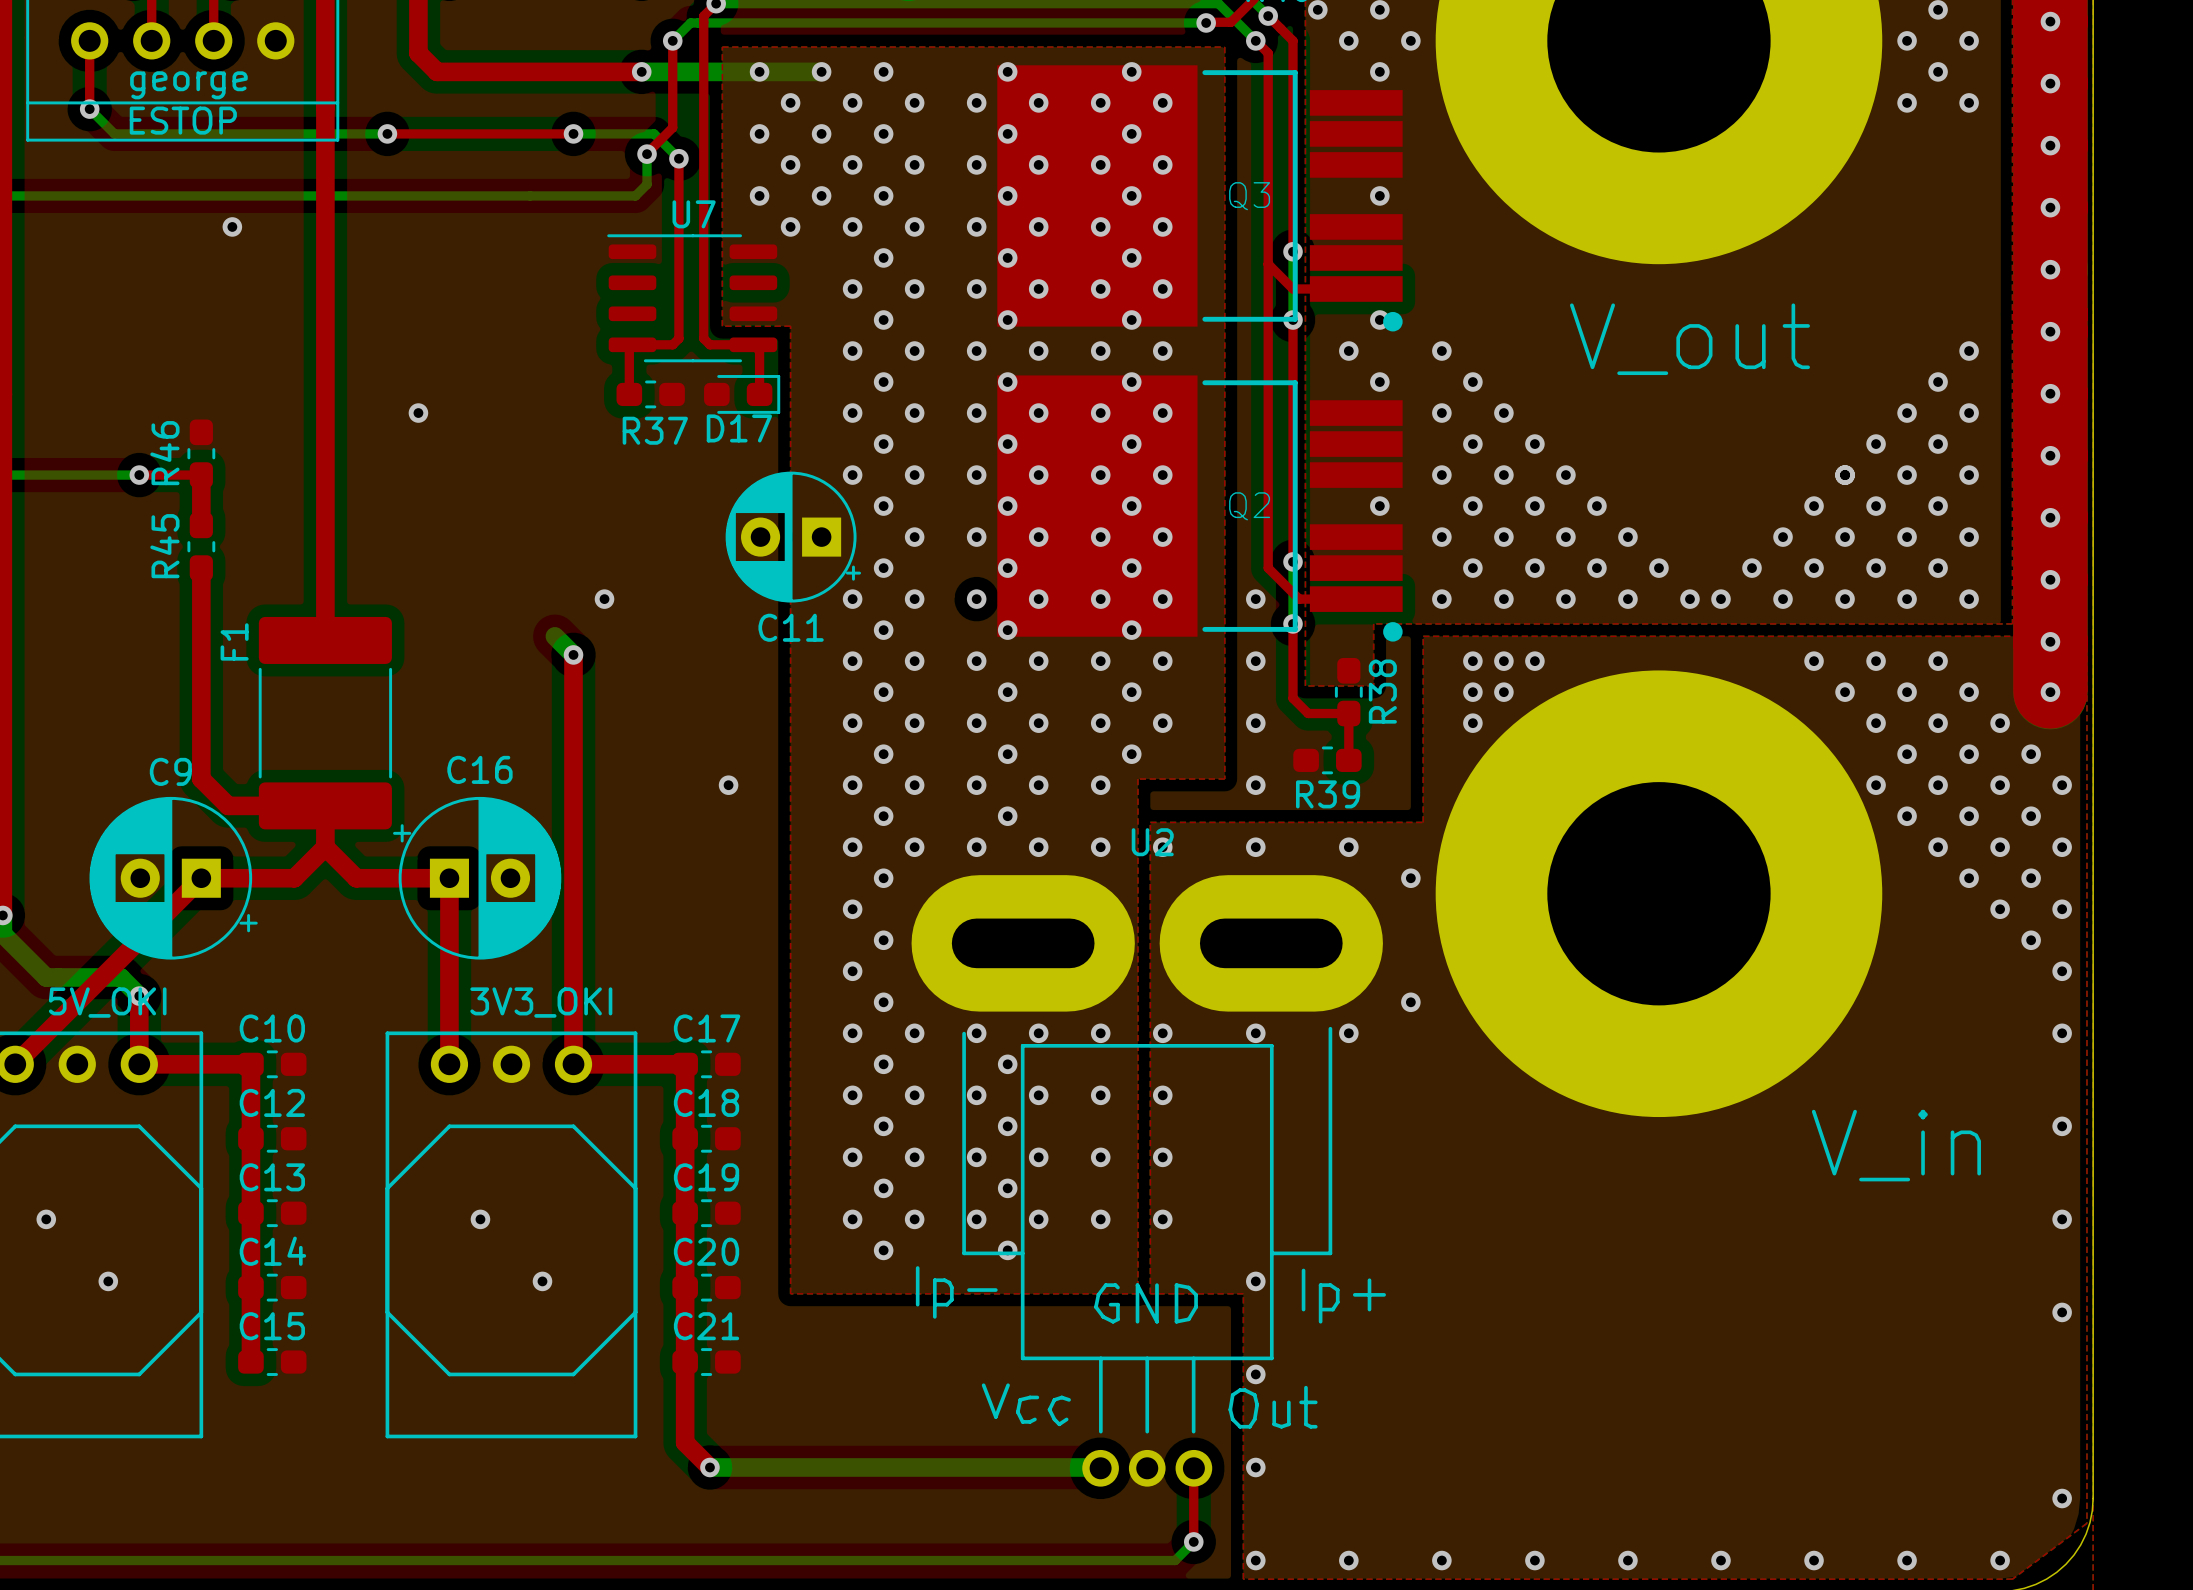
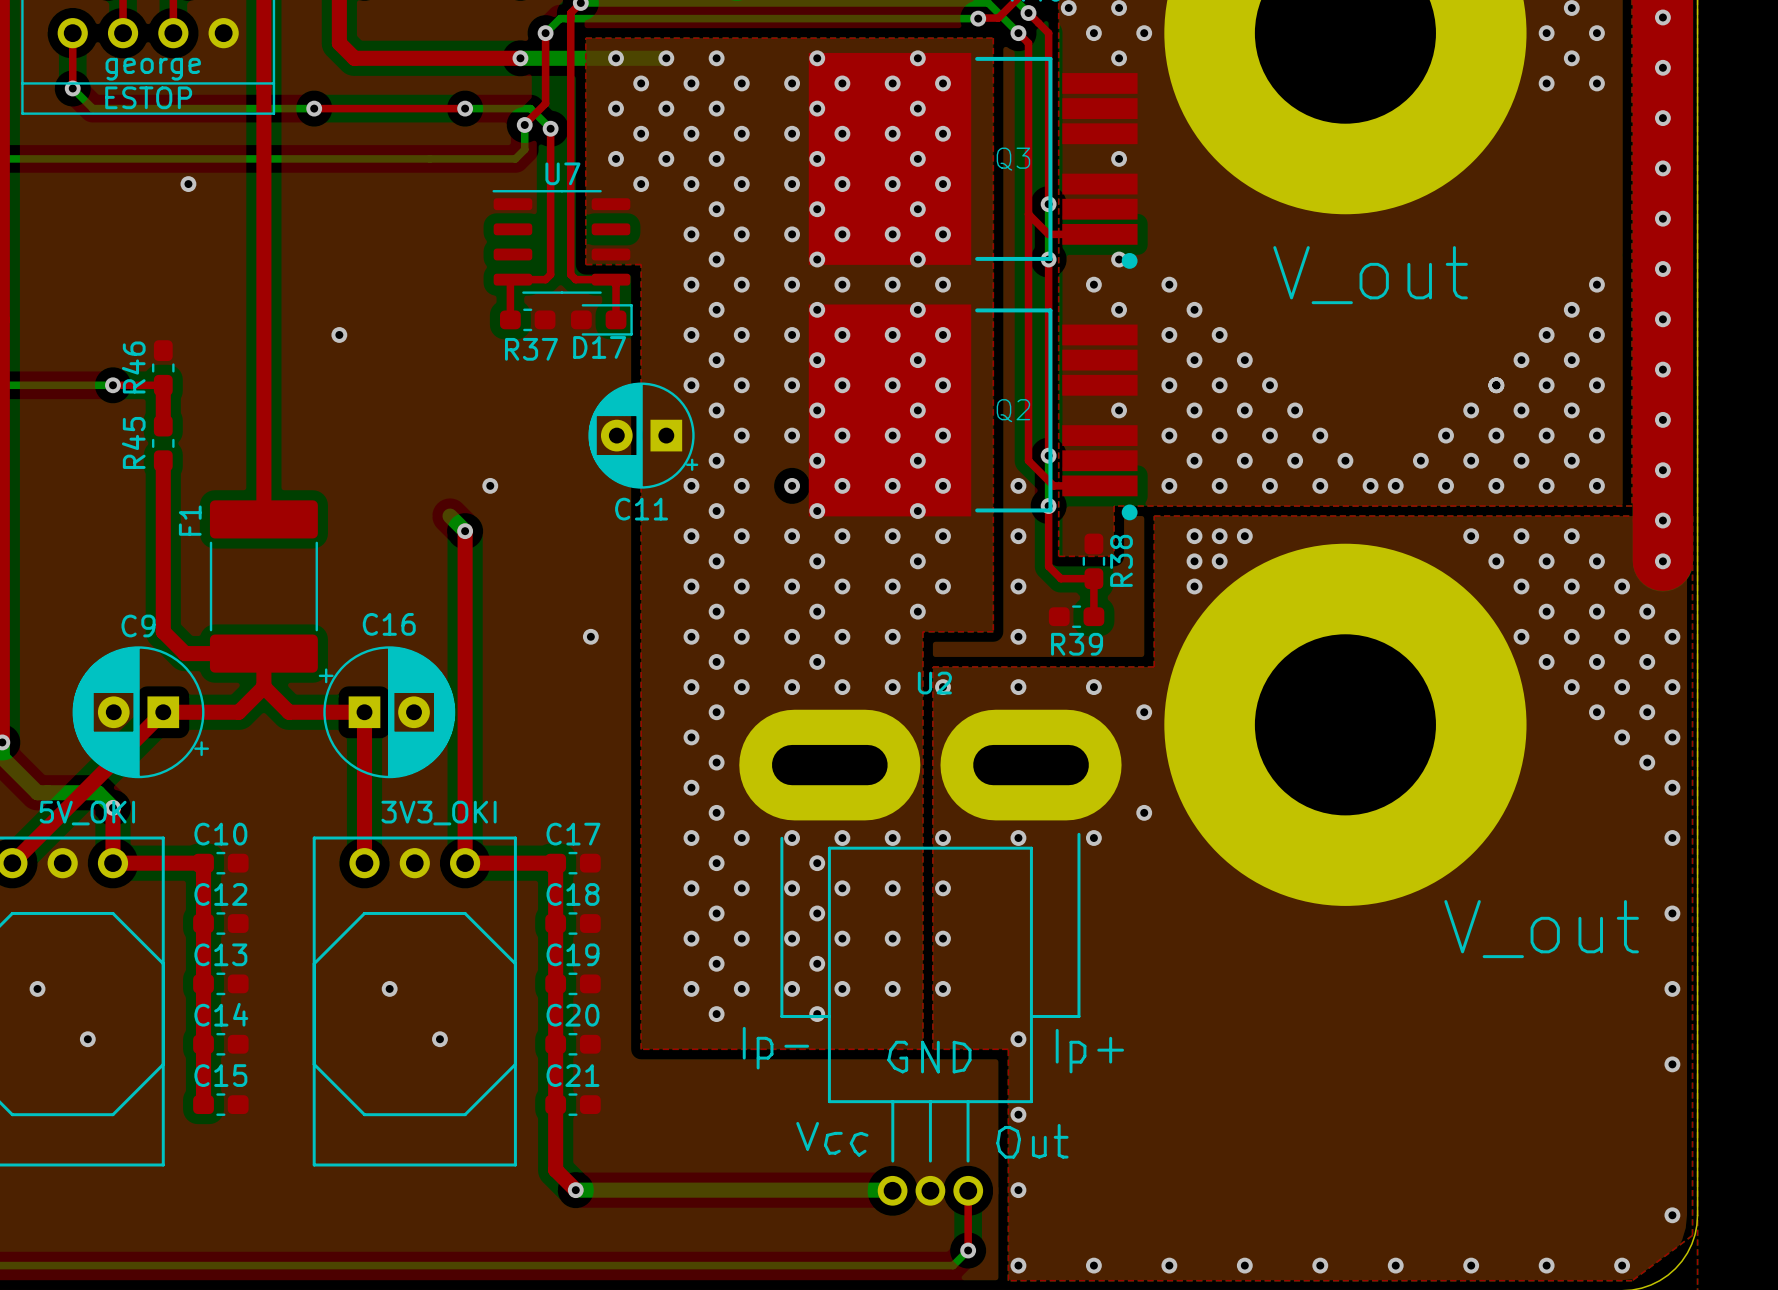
text: V_in (1896, 1145) -> V_out (1541, 929)

